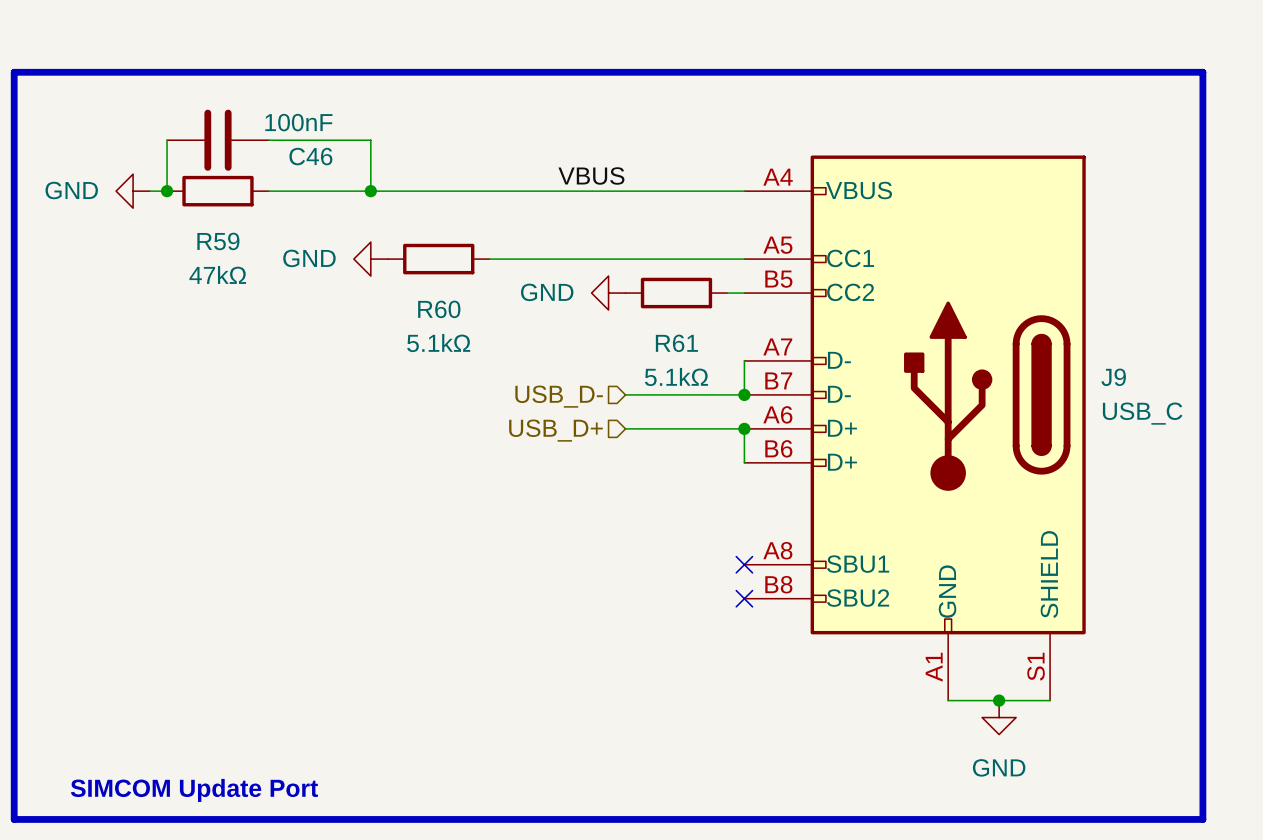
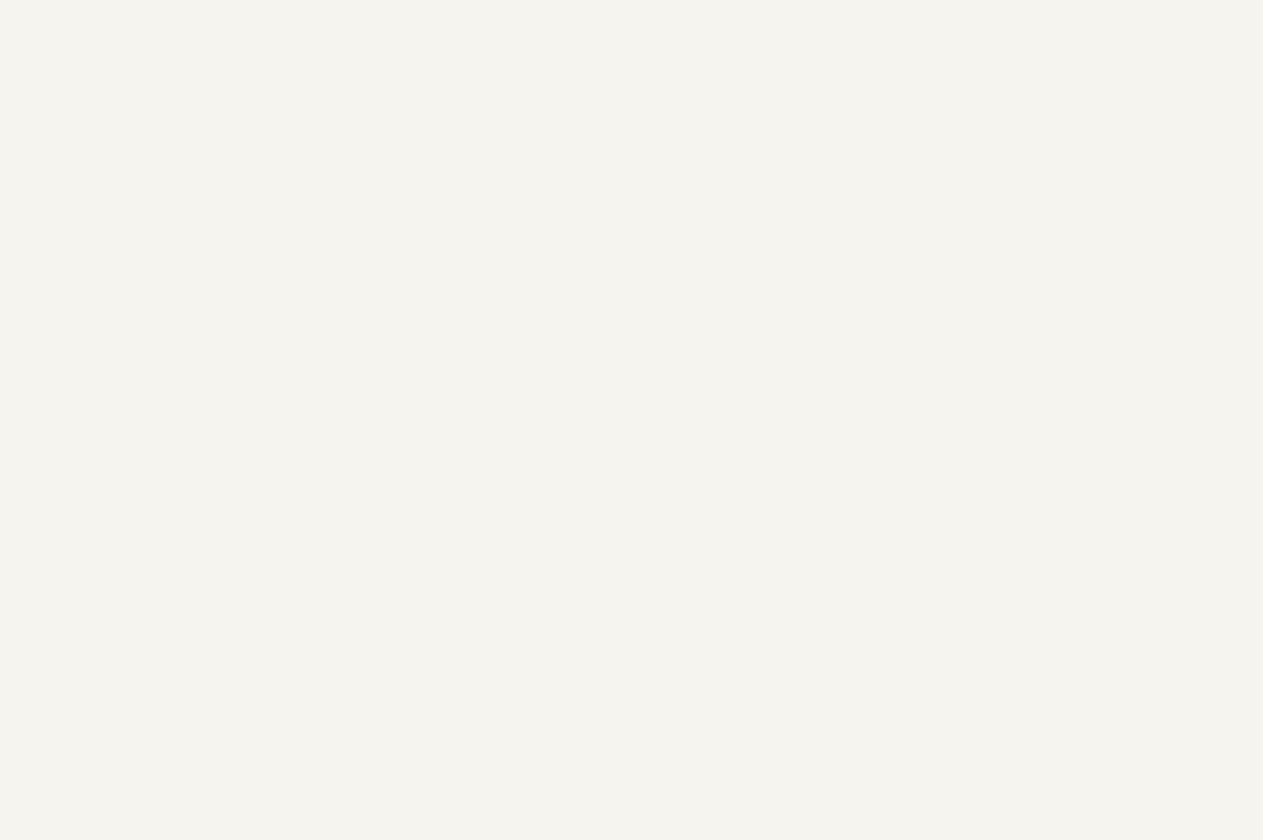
line: (14, 72) (1202, 72) (1202, 819) (14, 819) (14, 72) -> none
wire: (167, 140) (167, 191) (150, 191) -> none
C46: 100nF (217, 140) -> none
wire: (268, 140) (370, 140) (370, 191) -> none
label: VBUS (591, 175) -> none
power symbol: GND (133, 191) -> none
junction: (167, 191) -> none
R59: 47kΩ (217, 191) -> none
wire: (268, 191) (744, 191) -> none
junction: (370, 191) -> none
power symbol: GND (370, 259) -> none
R60: 5.1kΩ (438, 259) -> none
wire: (489, 259) (744, 259) -> none
power symbol: GND (608, 293) -> none
R61: 5.1kΩ (676, 293) -> none
wire: (727, 293) (744, 293) -> none
wire: (744, 360) (744, 394) (625, 394) -> none
junction: (744, 394) -> none
hierarchical label: USB_D- (559, 396) -> none
wire: (625, 428) (744, 428) (744, 462) -> none
junction: (744, 428) -> none
J9: USB_C (915, 428) -> none
hierarchical label: USB_D+ (555, 430) -> none
no-connect mark: (744, 564) -> none
no-connect mark: (744, 598) -> none
wire: (948, 700) (1050, 700) -> none
junction: (999, 700) -> none
power symbol: GND (999, 717) -> none
text: SIMCOM Update Port (194, 790) -> none

